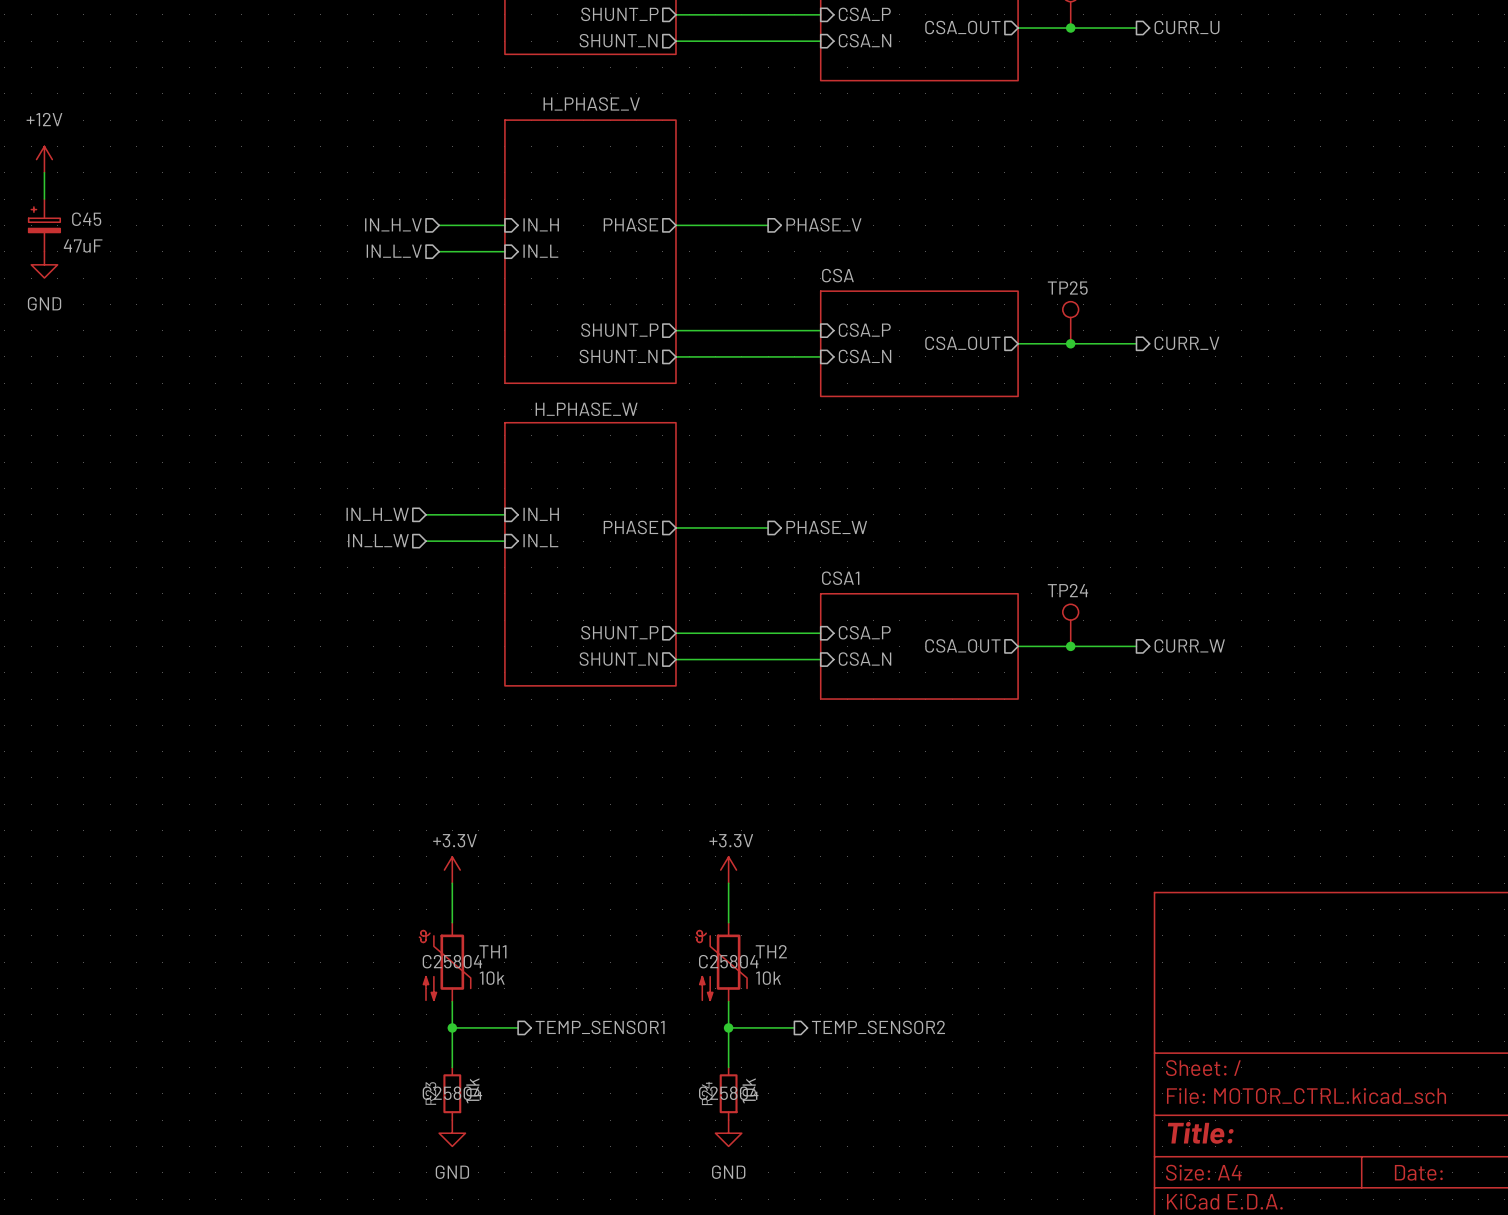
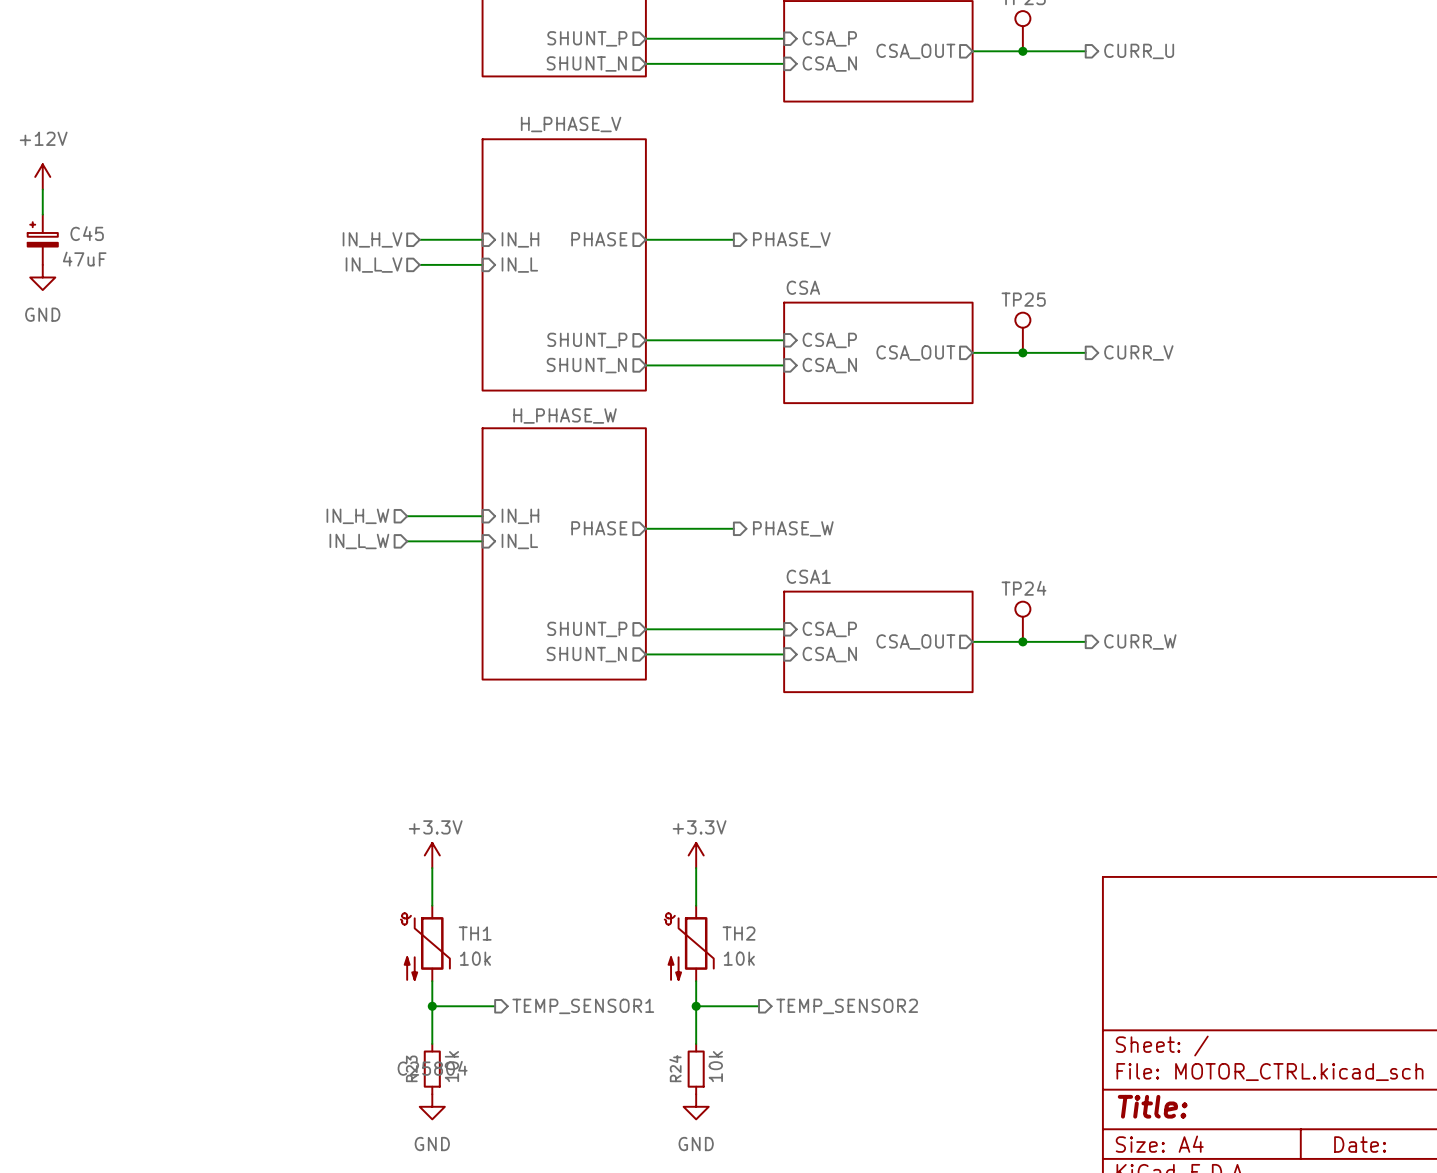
TH1 text: C25804 (452, 961) -> none
TH2 text: C25804 (728, 961) -> none
R24 text: C25804 (728, 1093) -> none

